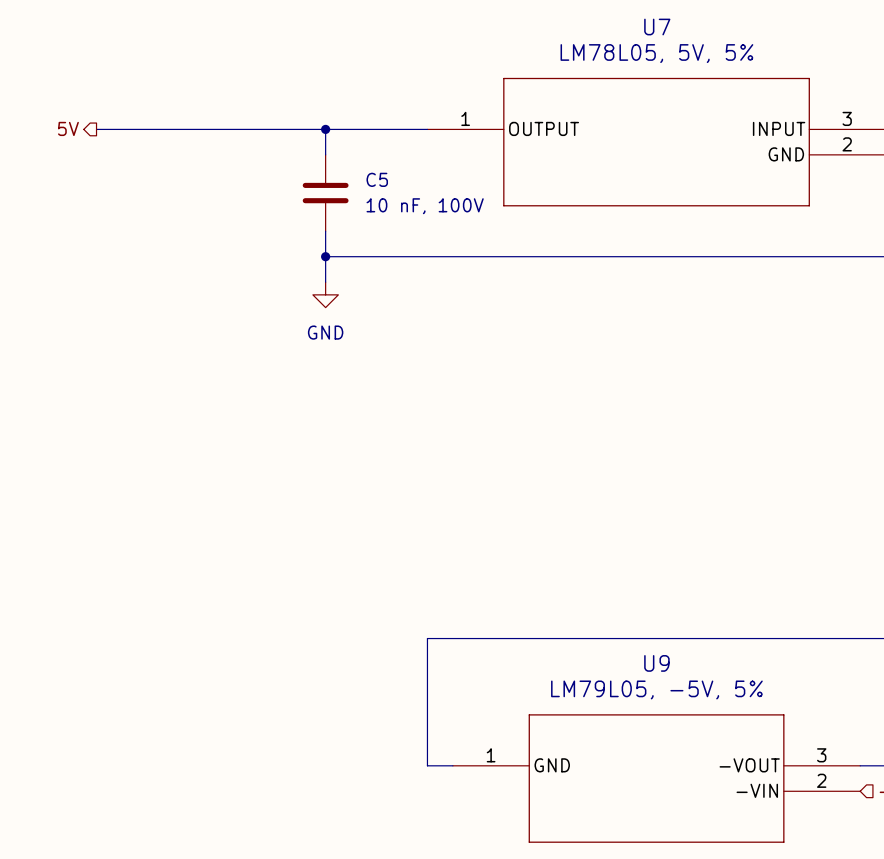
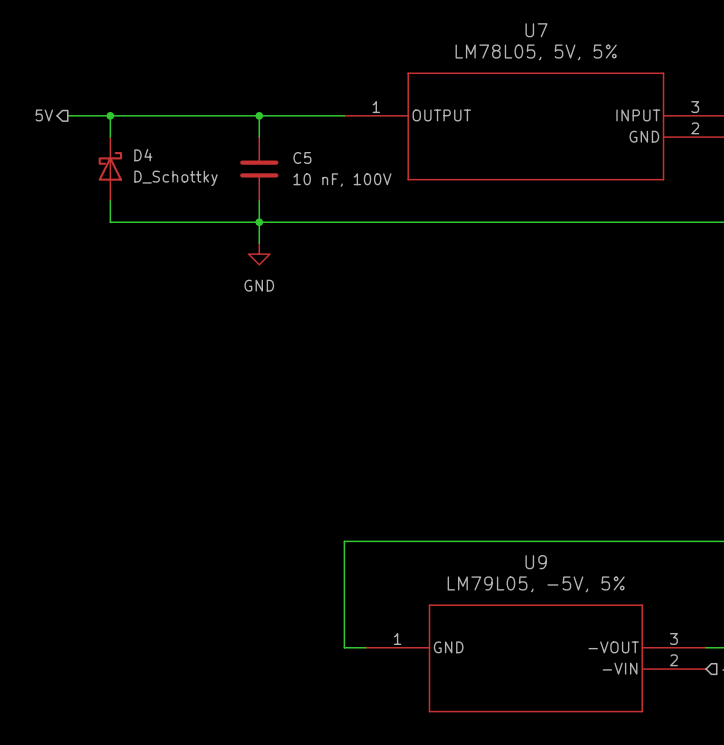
wire: none -> (110, 115) (110, 137)
junction: none -> (110, 115)
D4: none -> D_Schottky (110, 169)
wire: none -> (110, 200) (110, 222) (259, 222)

